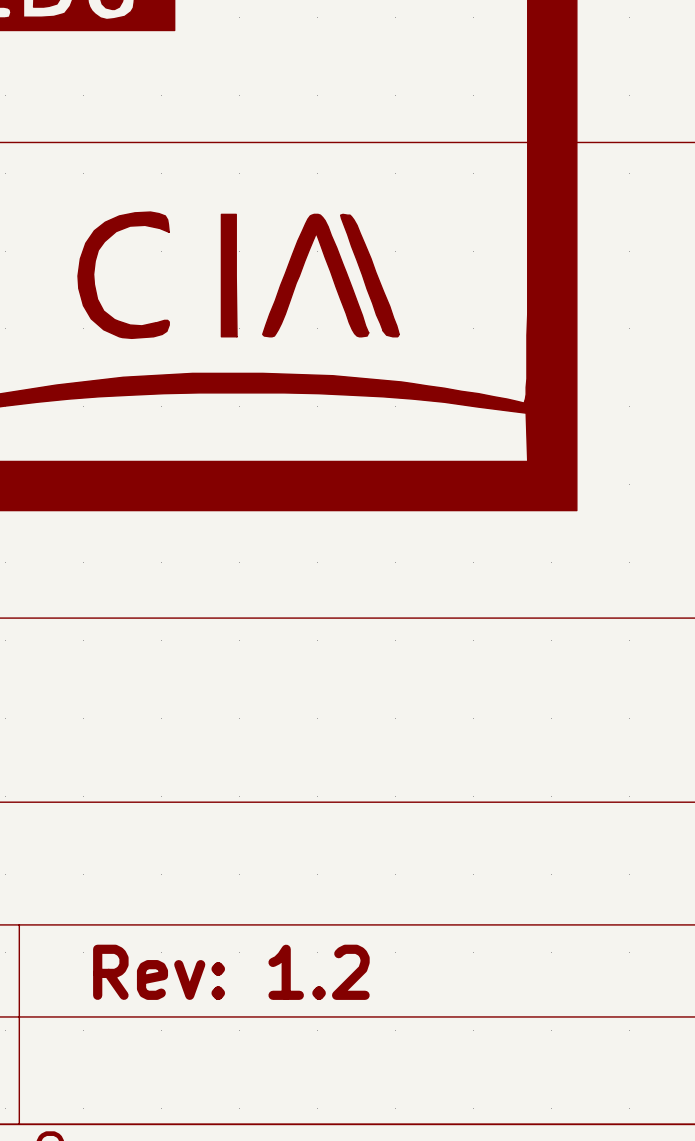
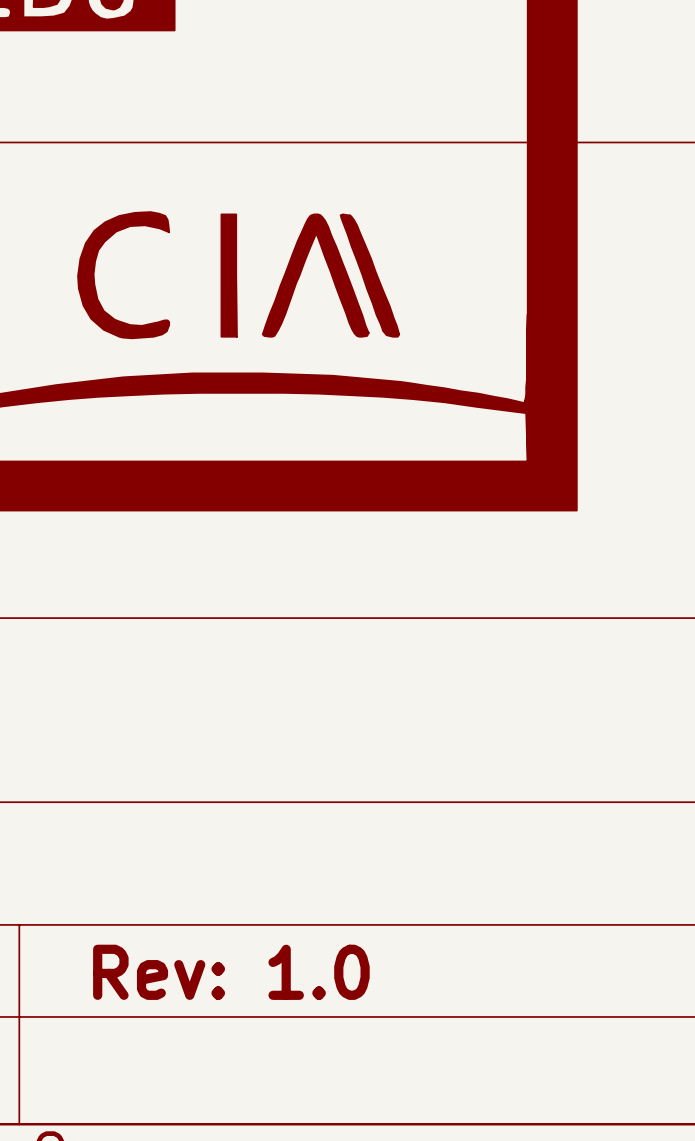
title block: Rev: 1.2 (231, 972) -> Rev: 1.0 (231, 972)

